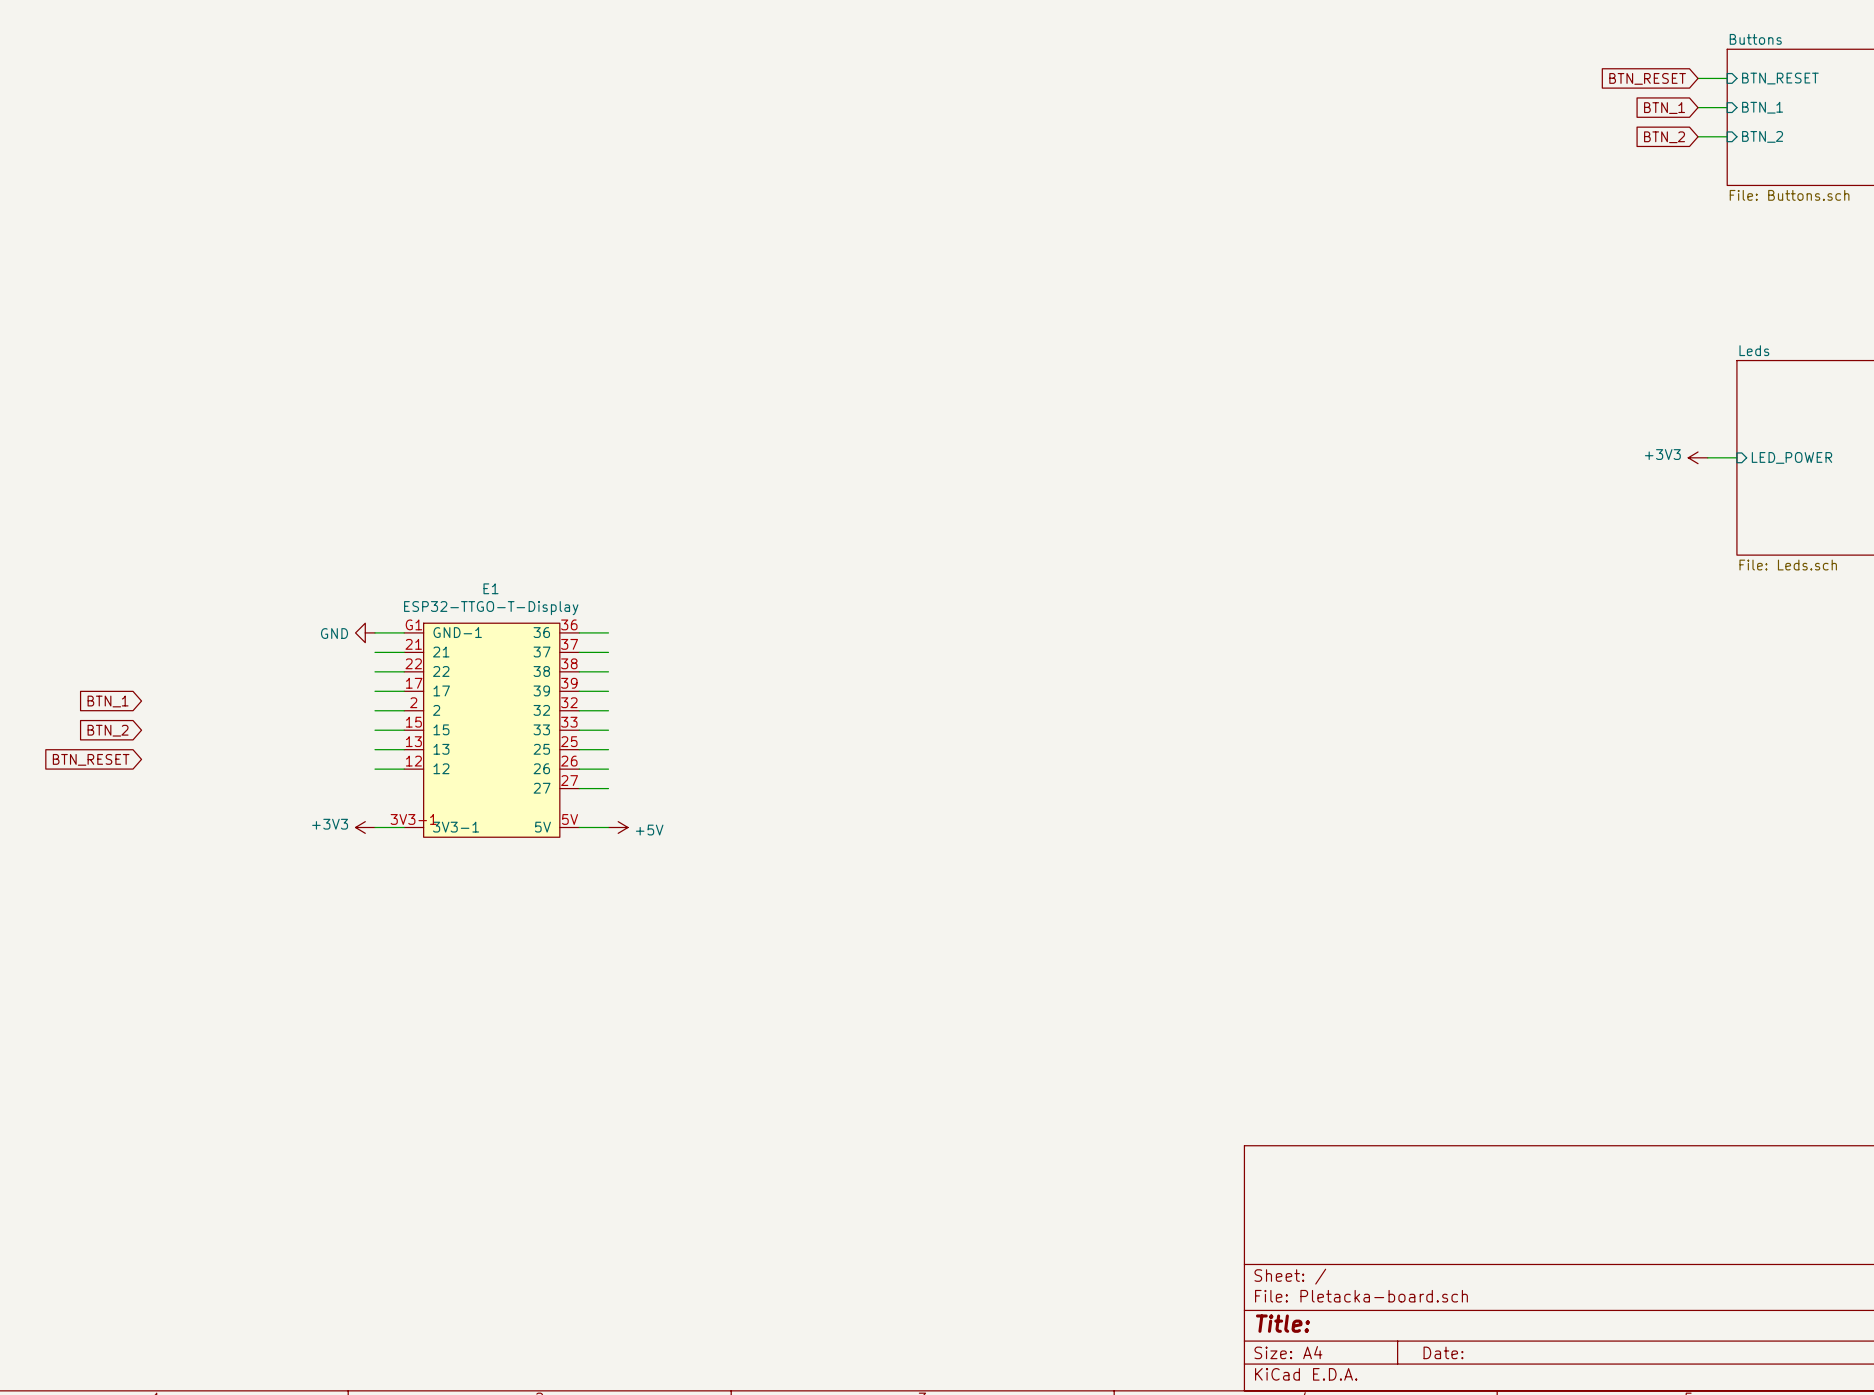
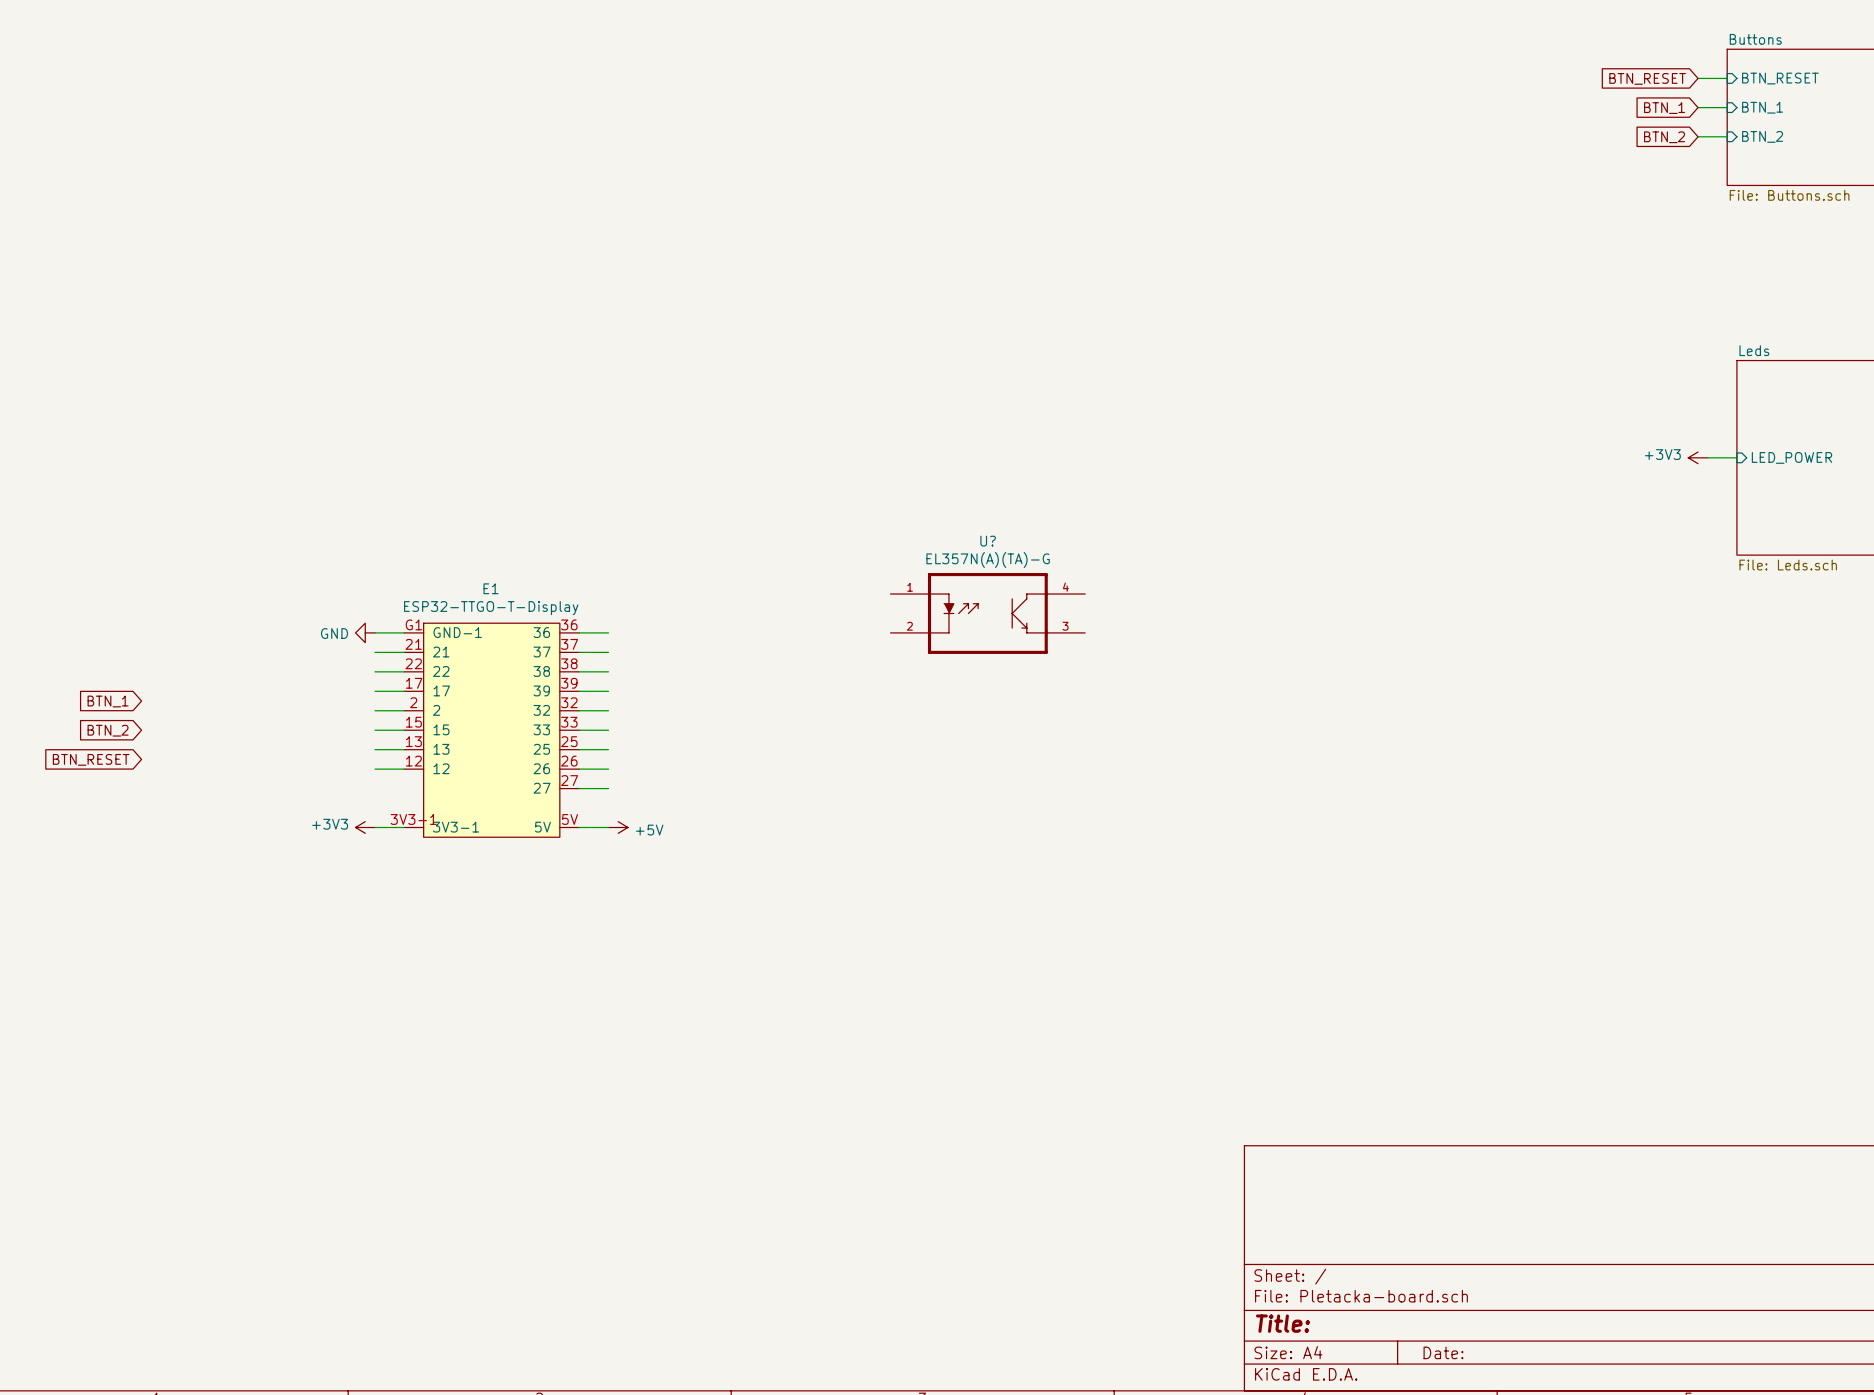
U?: none -> EL357N(A)(TA)-G (987, 613)

